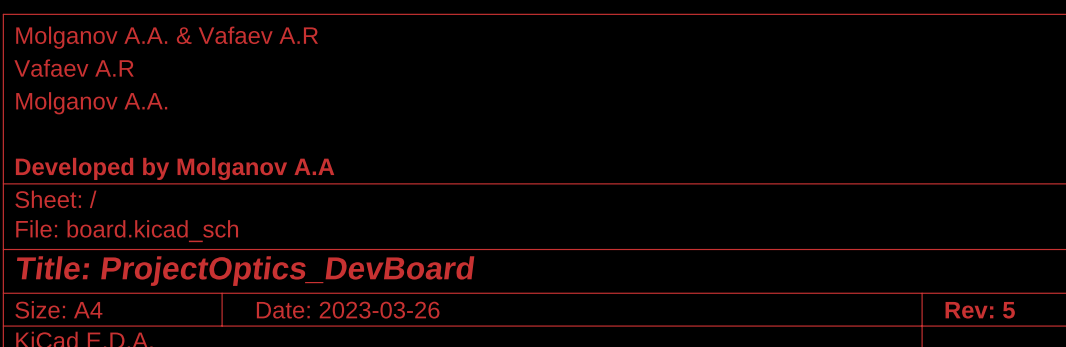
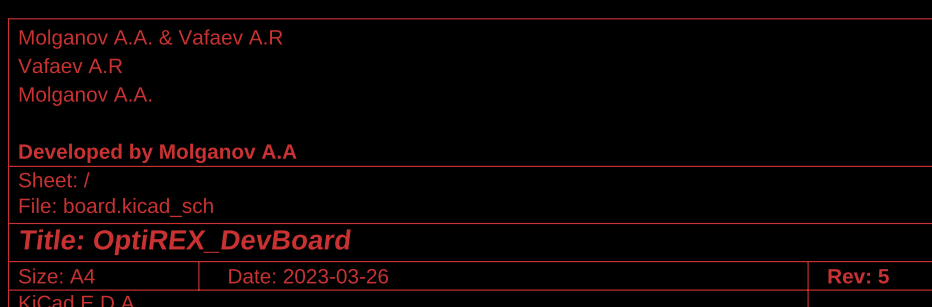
title block: Title: ProjectOptics_DevBoard (245, 271) -> Title: OptiREX_DevBoard (185, 242)

